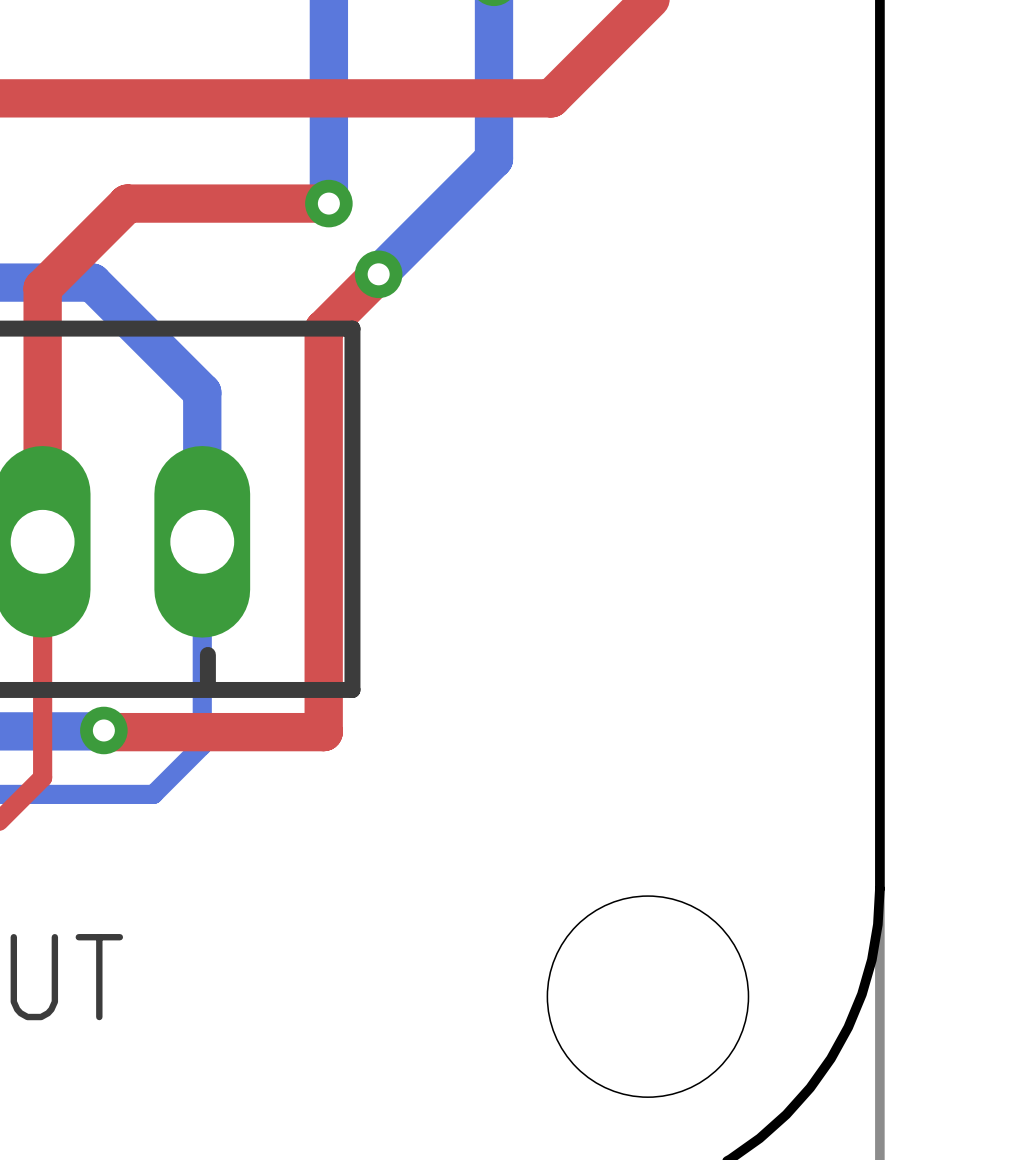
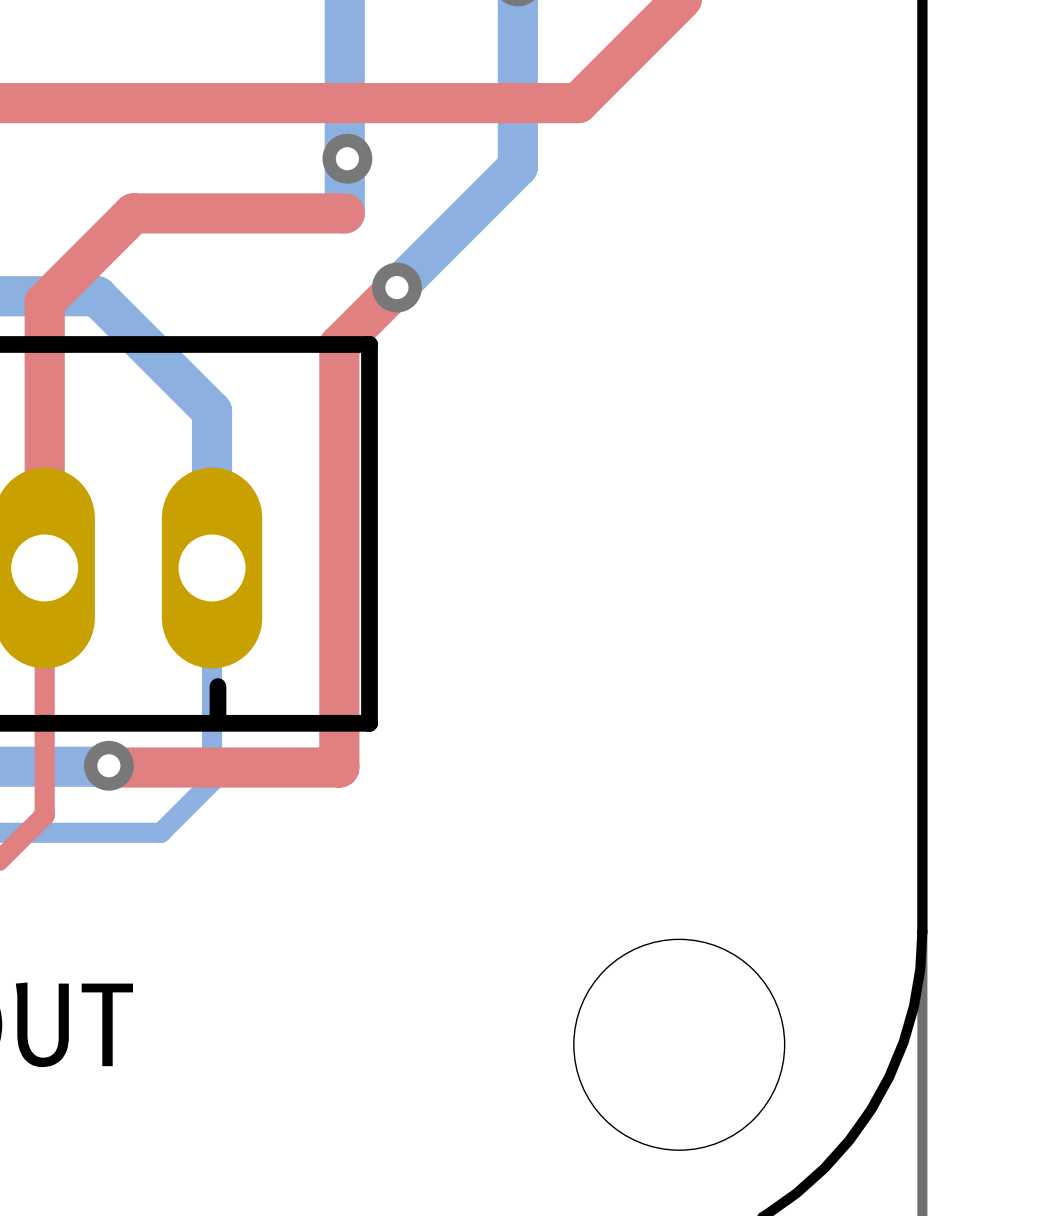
via position: (328, 203) -> (347, 158)

